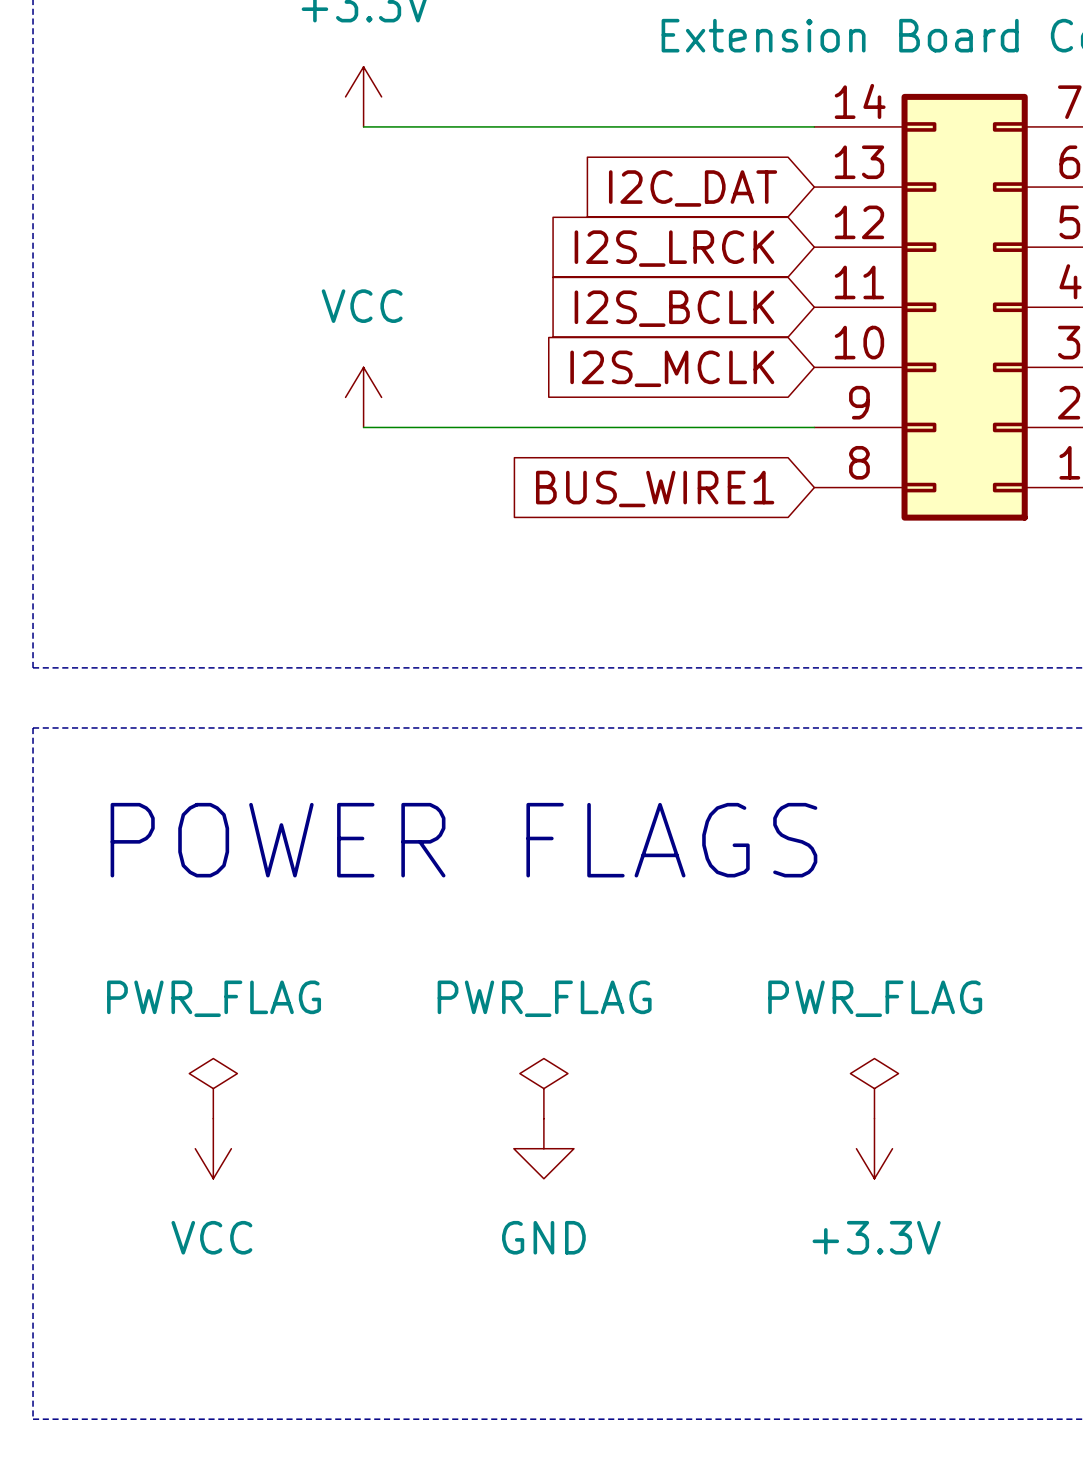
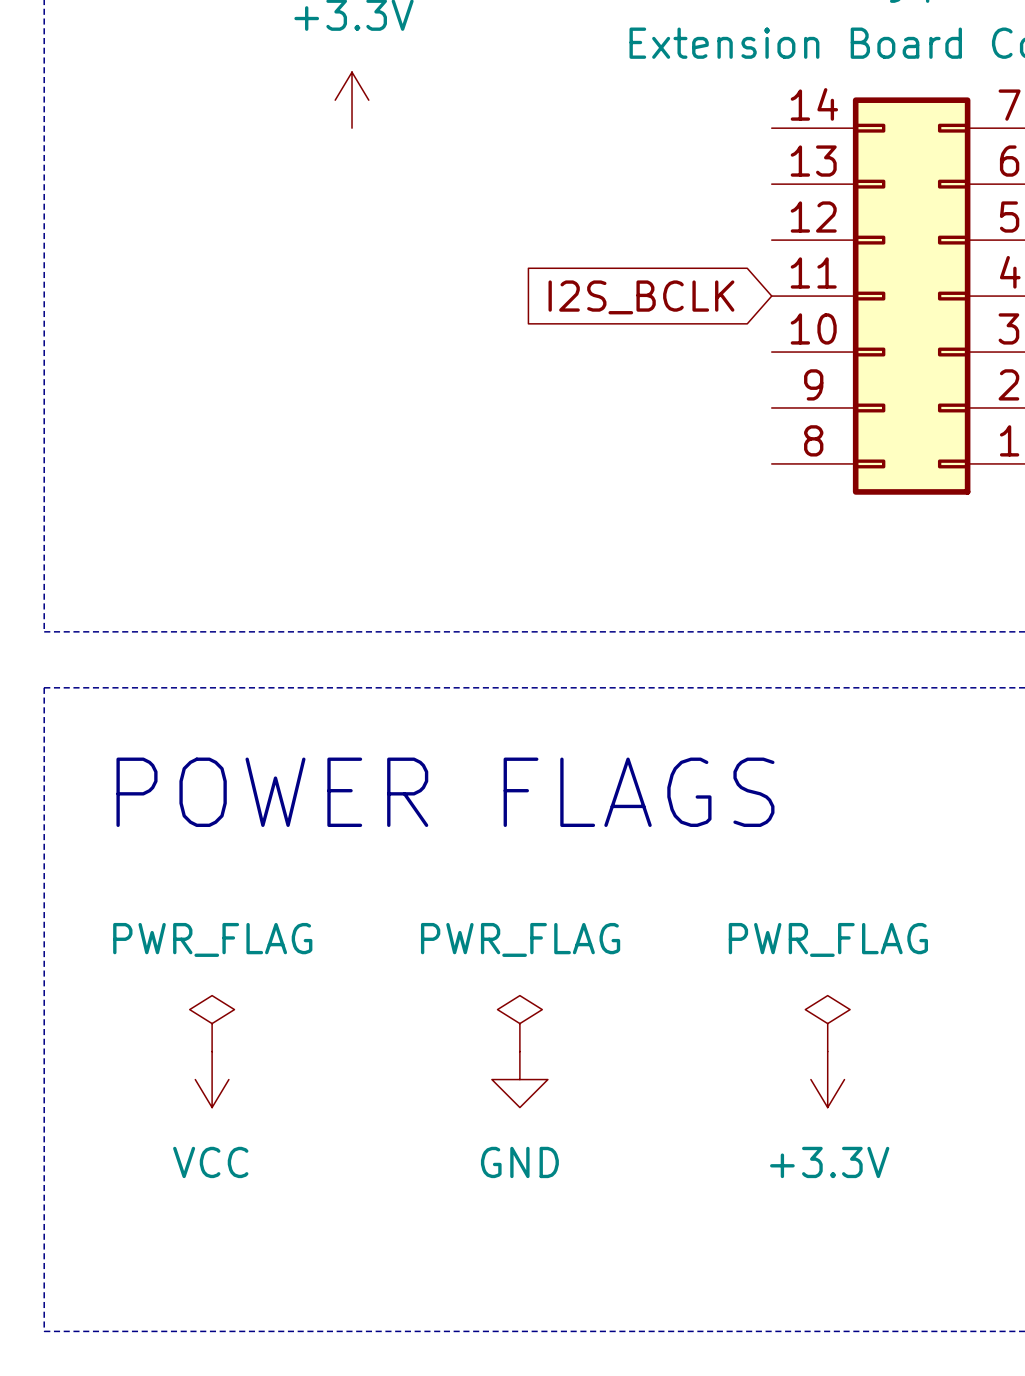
wire: (363, 126) (814, 126) -> none
global label: I2C_DAT (693, 188) -> none
global label: I2S_LRCK (674, 248) -> none
global label: I2S_MCLK (672, 368) -> none
power symbol: VCC (363, 397) -> none
wire: (363, 427) (814, 427) -> none
global label: BUS_WIRE1 (655, 489) -> none

